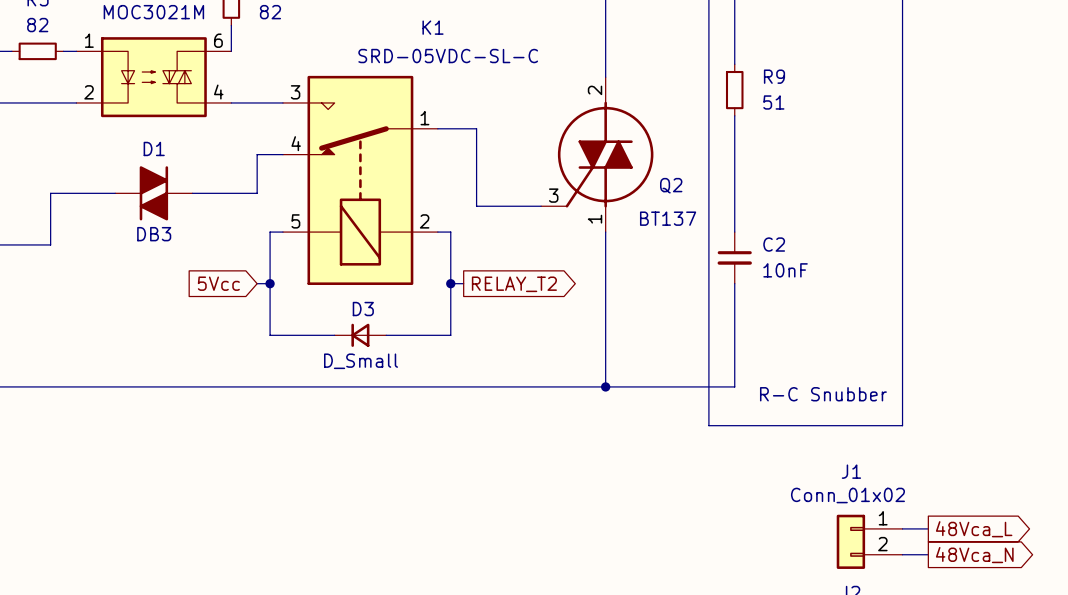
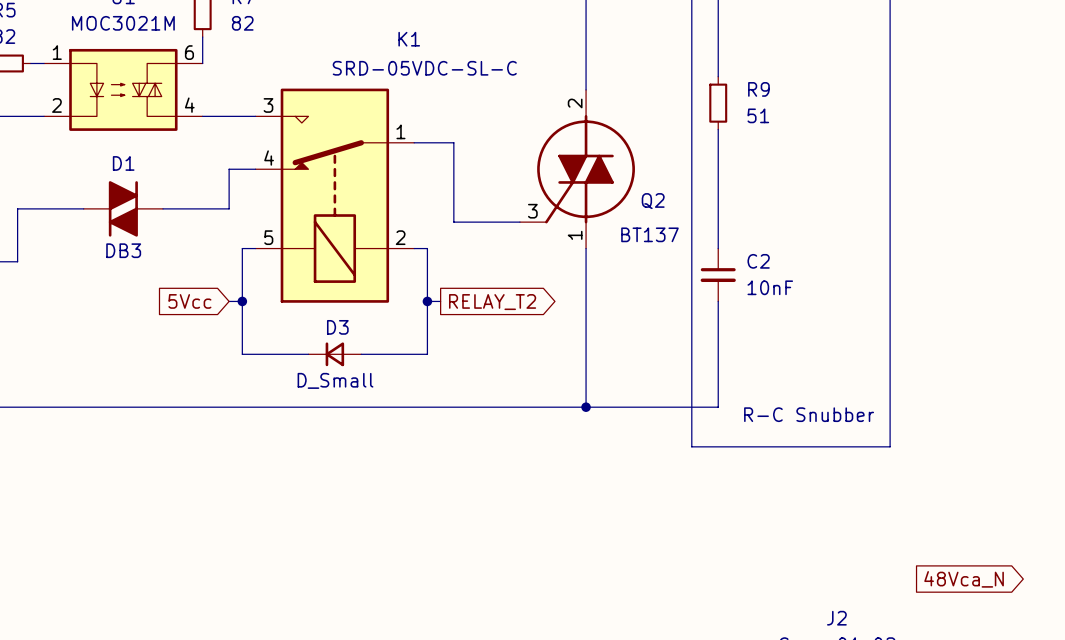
wire: (902, 528) (928, 528) -> none
global label: 48Vca_L (974, 529) -> none
J1: Conn_01x02 (869, 541) -> none
wire: (902, 554) (928, 554) -> none

